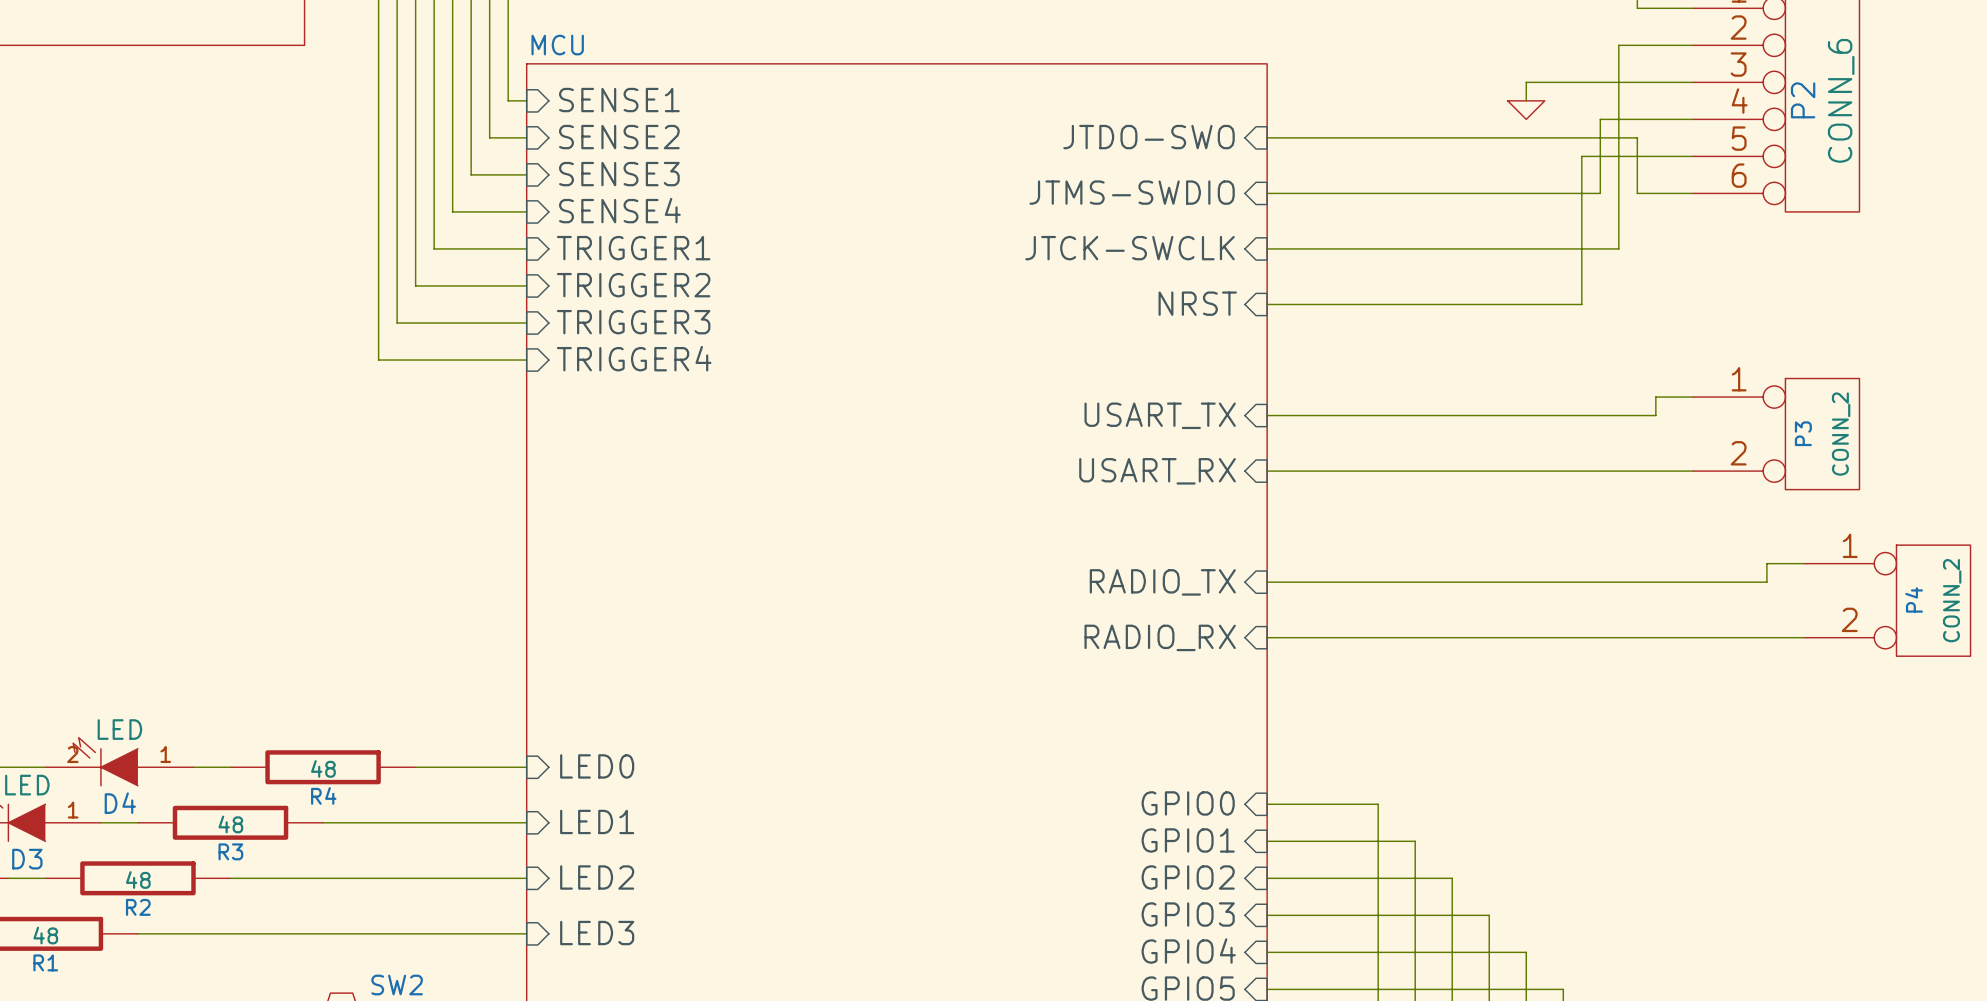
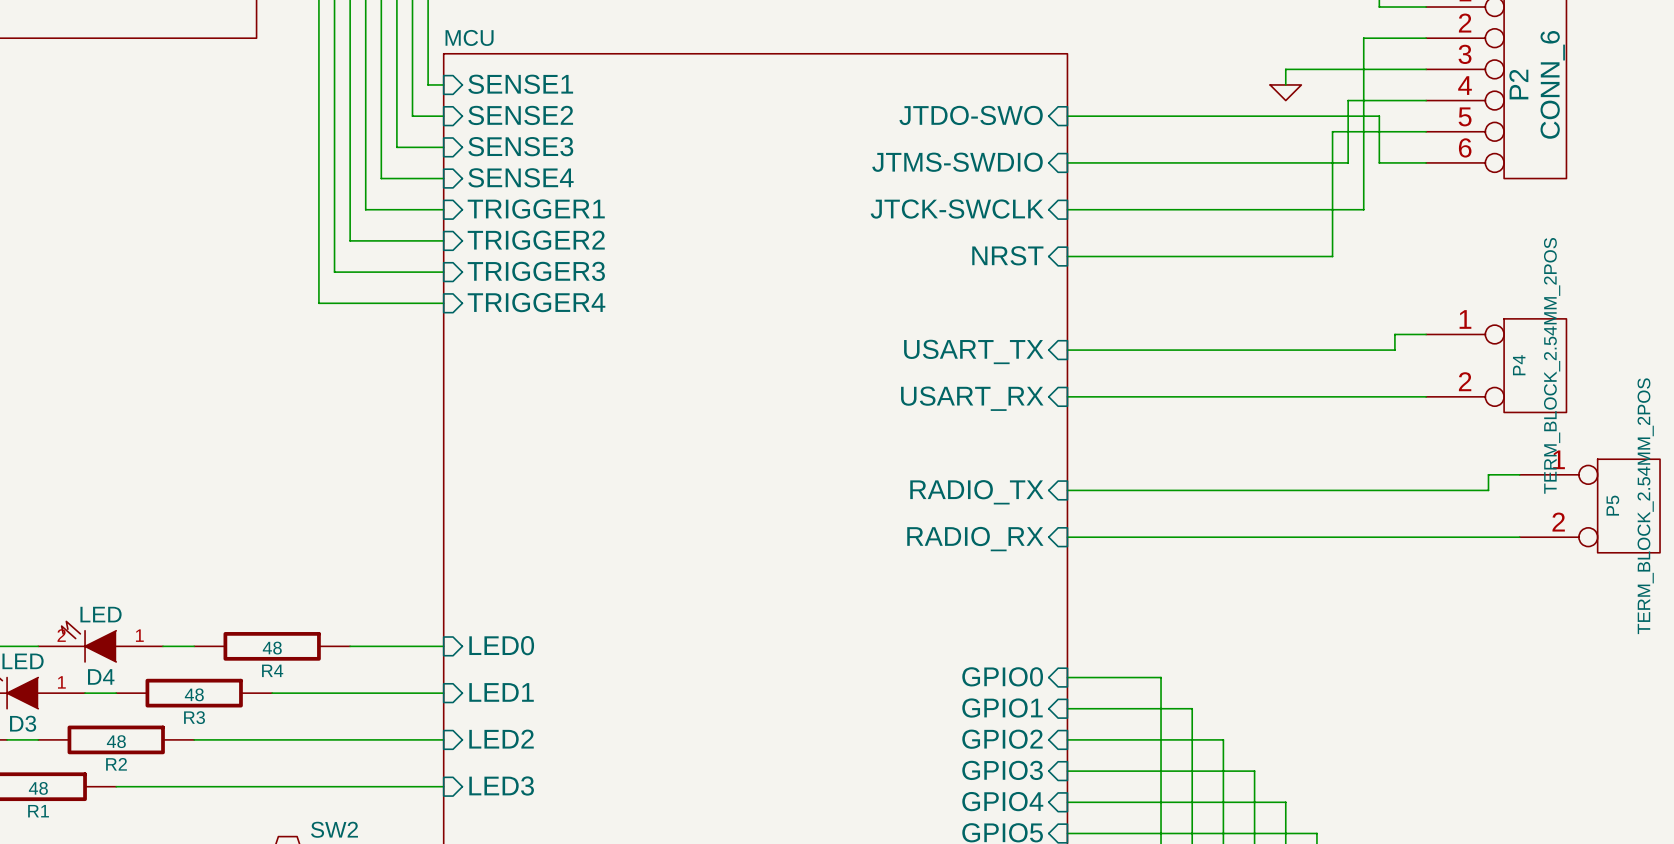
P3 name: P3 (1803, 433) -> P4 (1519, 365)
P3 value: CONN_2 (1841, 434) -> TERM_BLOCK_2.54MM_2POS (1552, 365)
P4 name: P4 (1914, 599) -> P5 (1612, 505)
P4 value: CONN_2 (1952, 600) -> TERM_BLOCK_2.54MM_2POS (1645, 506)

